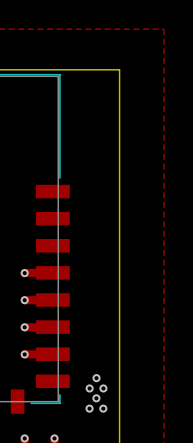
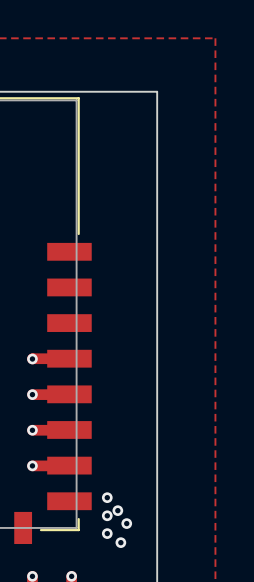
via: none -> (107, 497)
via: (96, 378) -> none
via: (103, 388) -> none
via: none -> (107, 515)
via: none -> (107, 533)
via: (89, 408) -> none
via: (103, 408) -> none
via: none -> (120, 542)

